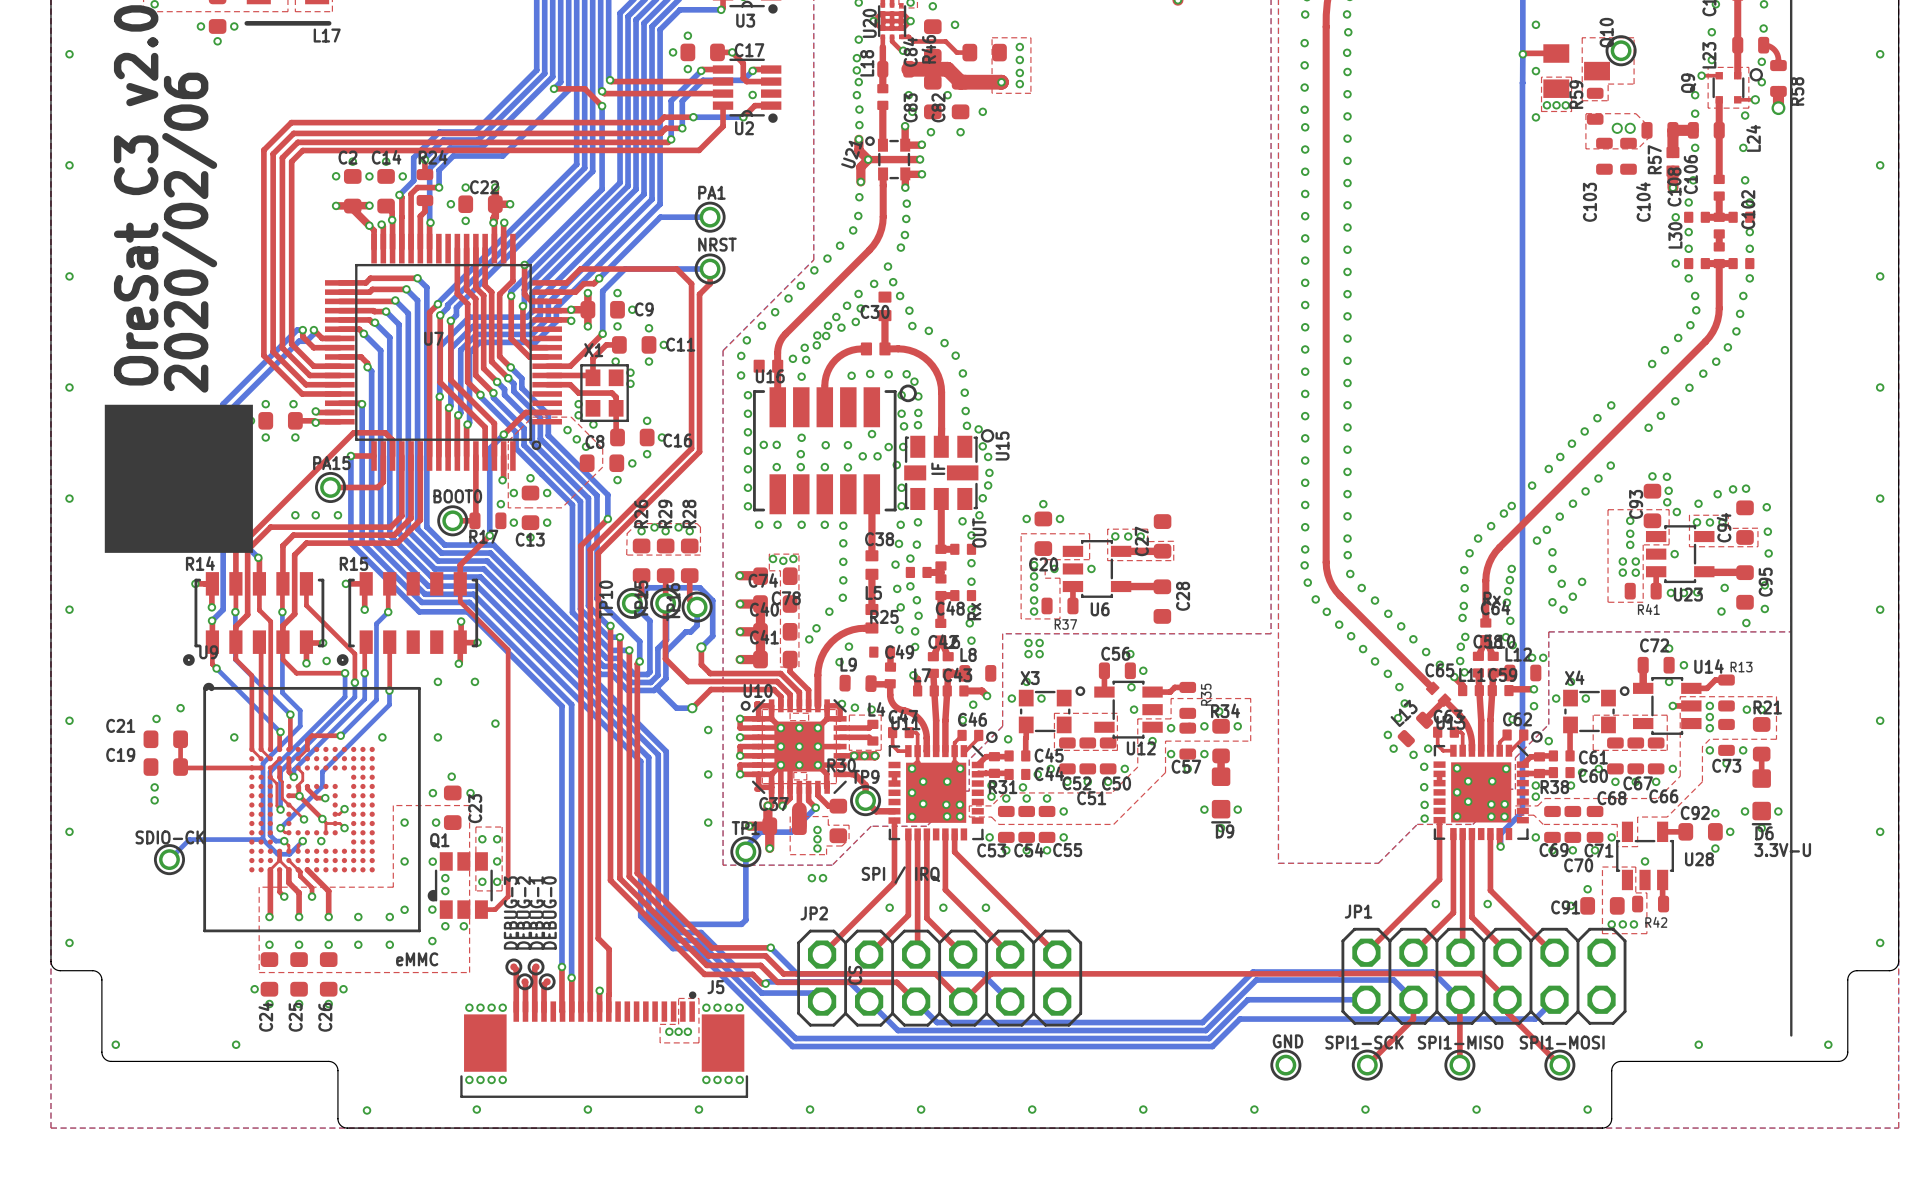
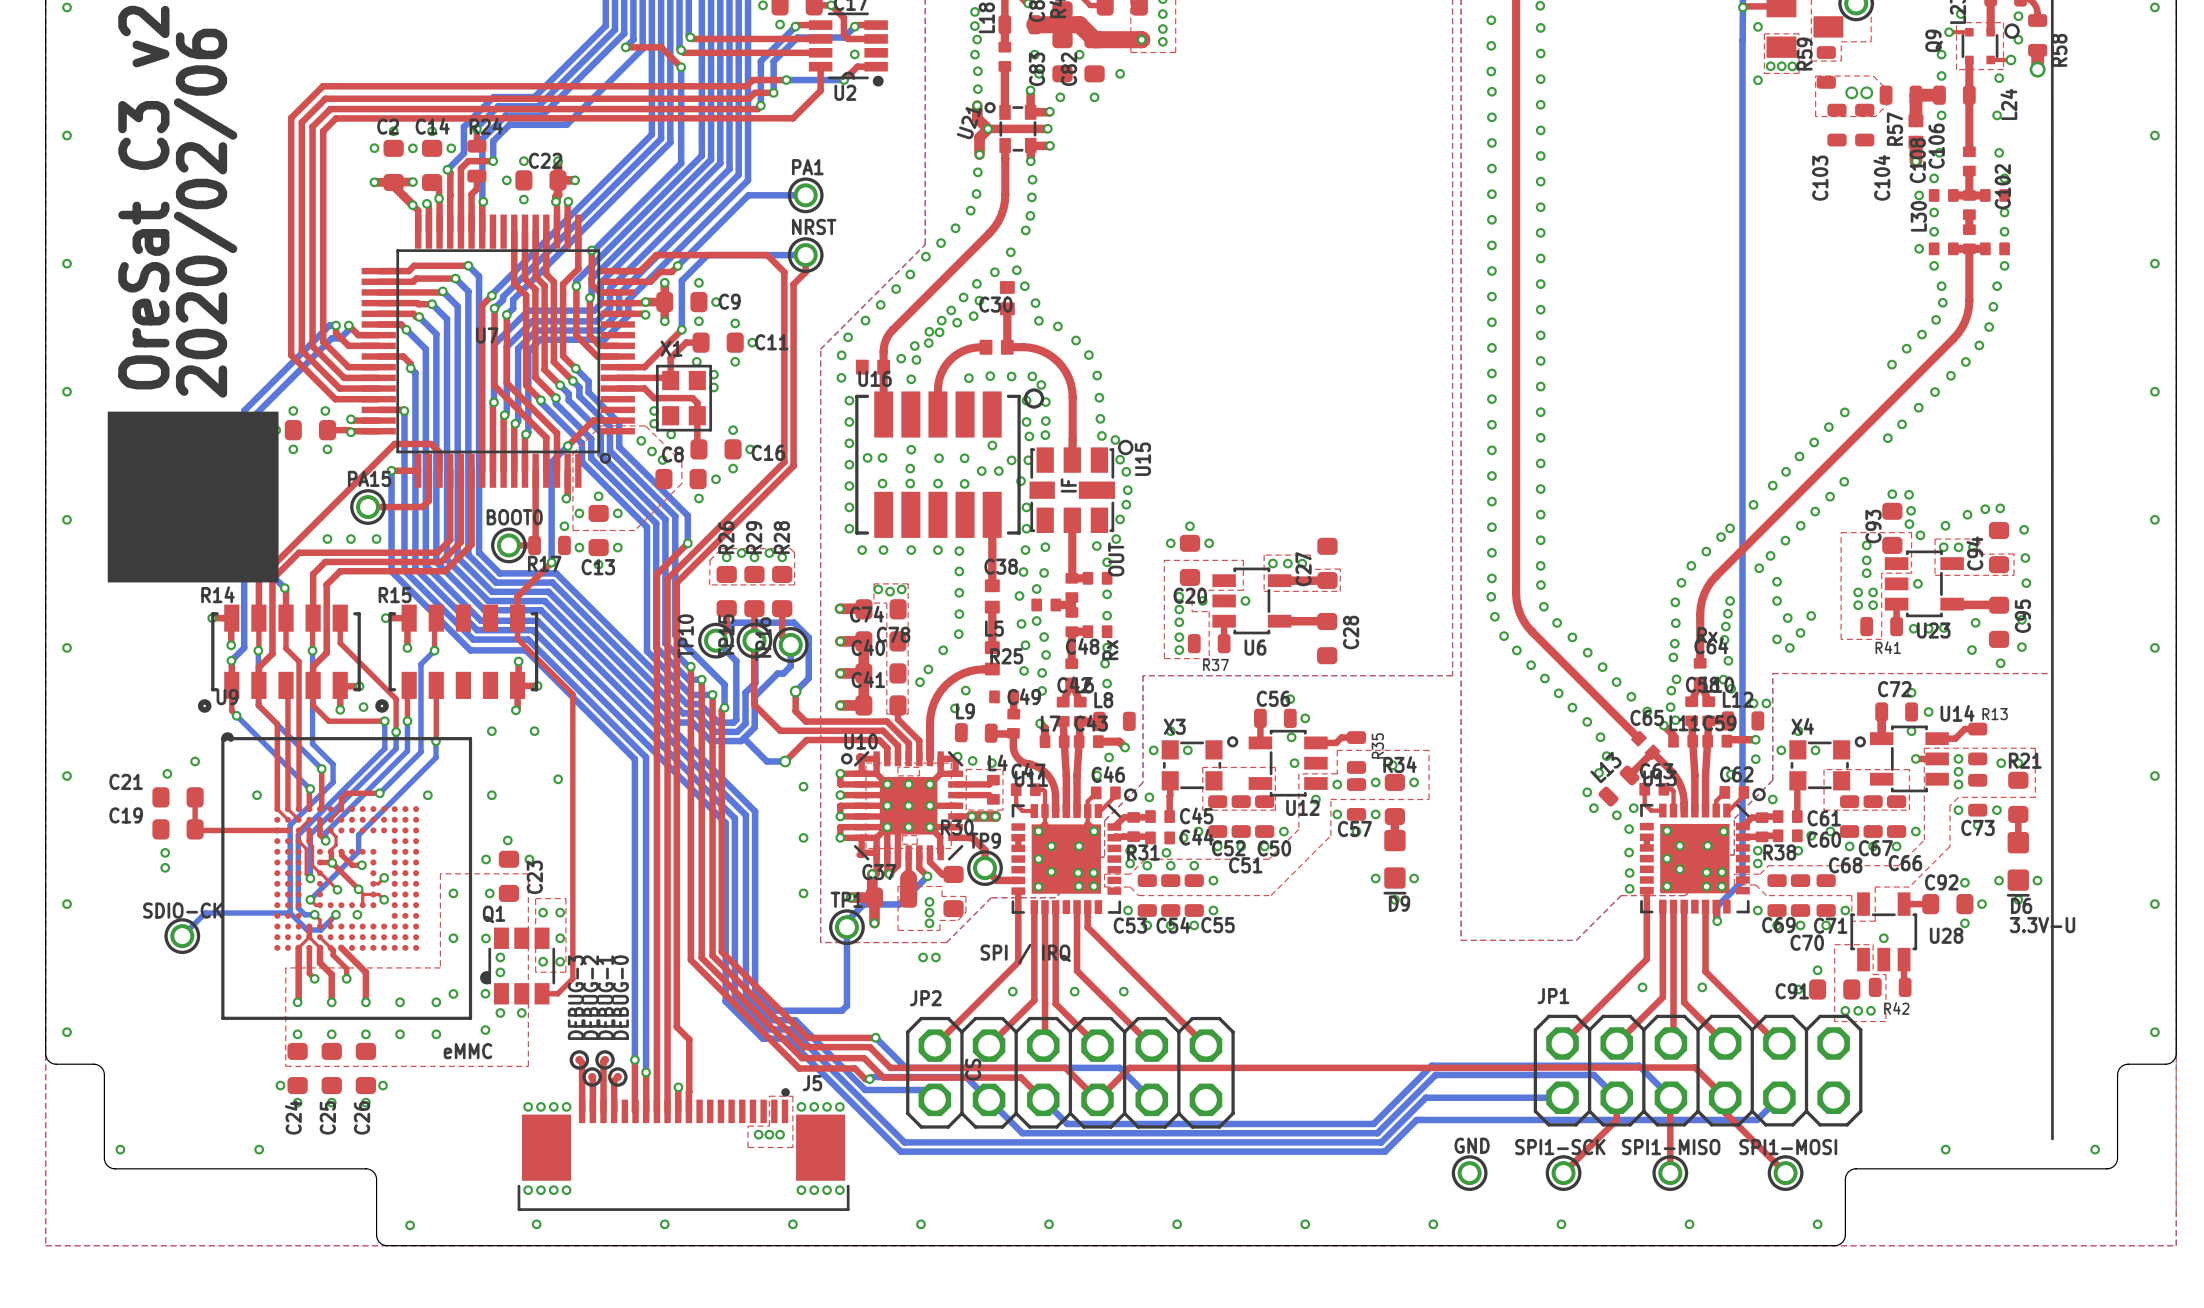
via: (1028, 643) -> none
via: (1039, 643) -> none
via: (1028, 654) -> none
via: (1039, 654) -> none

